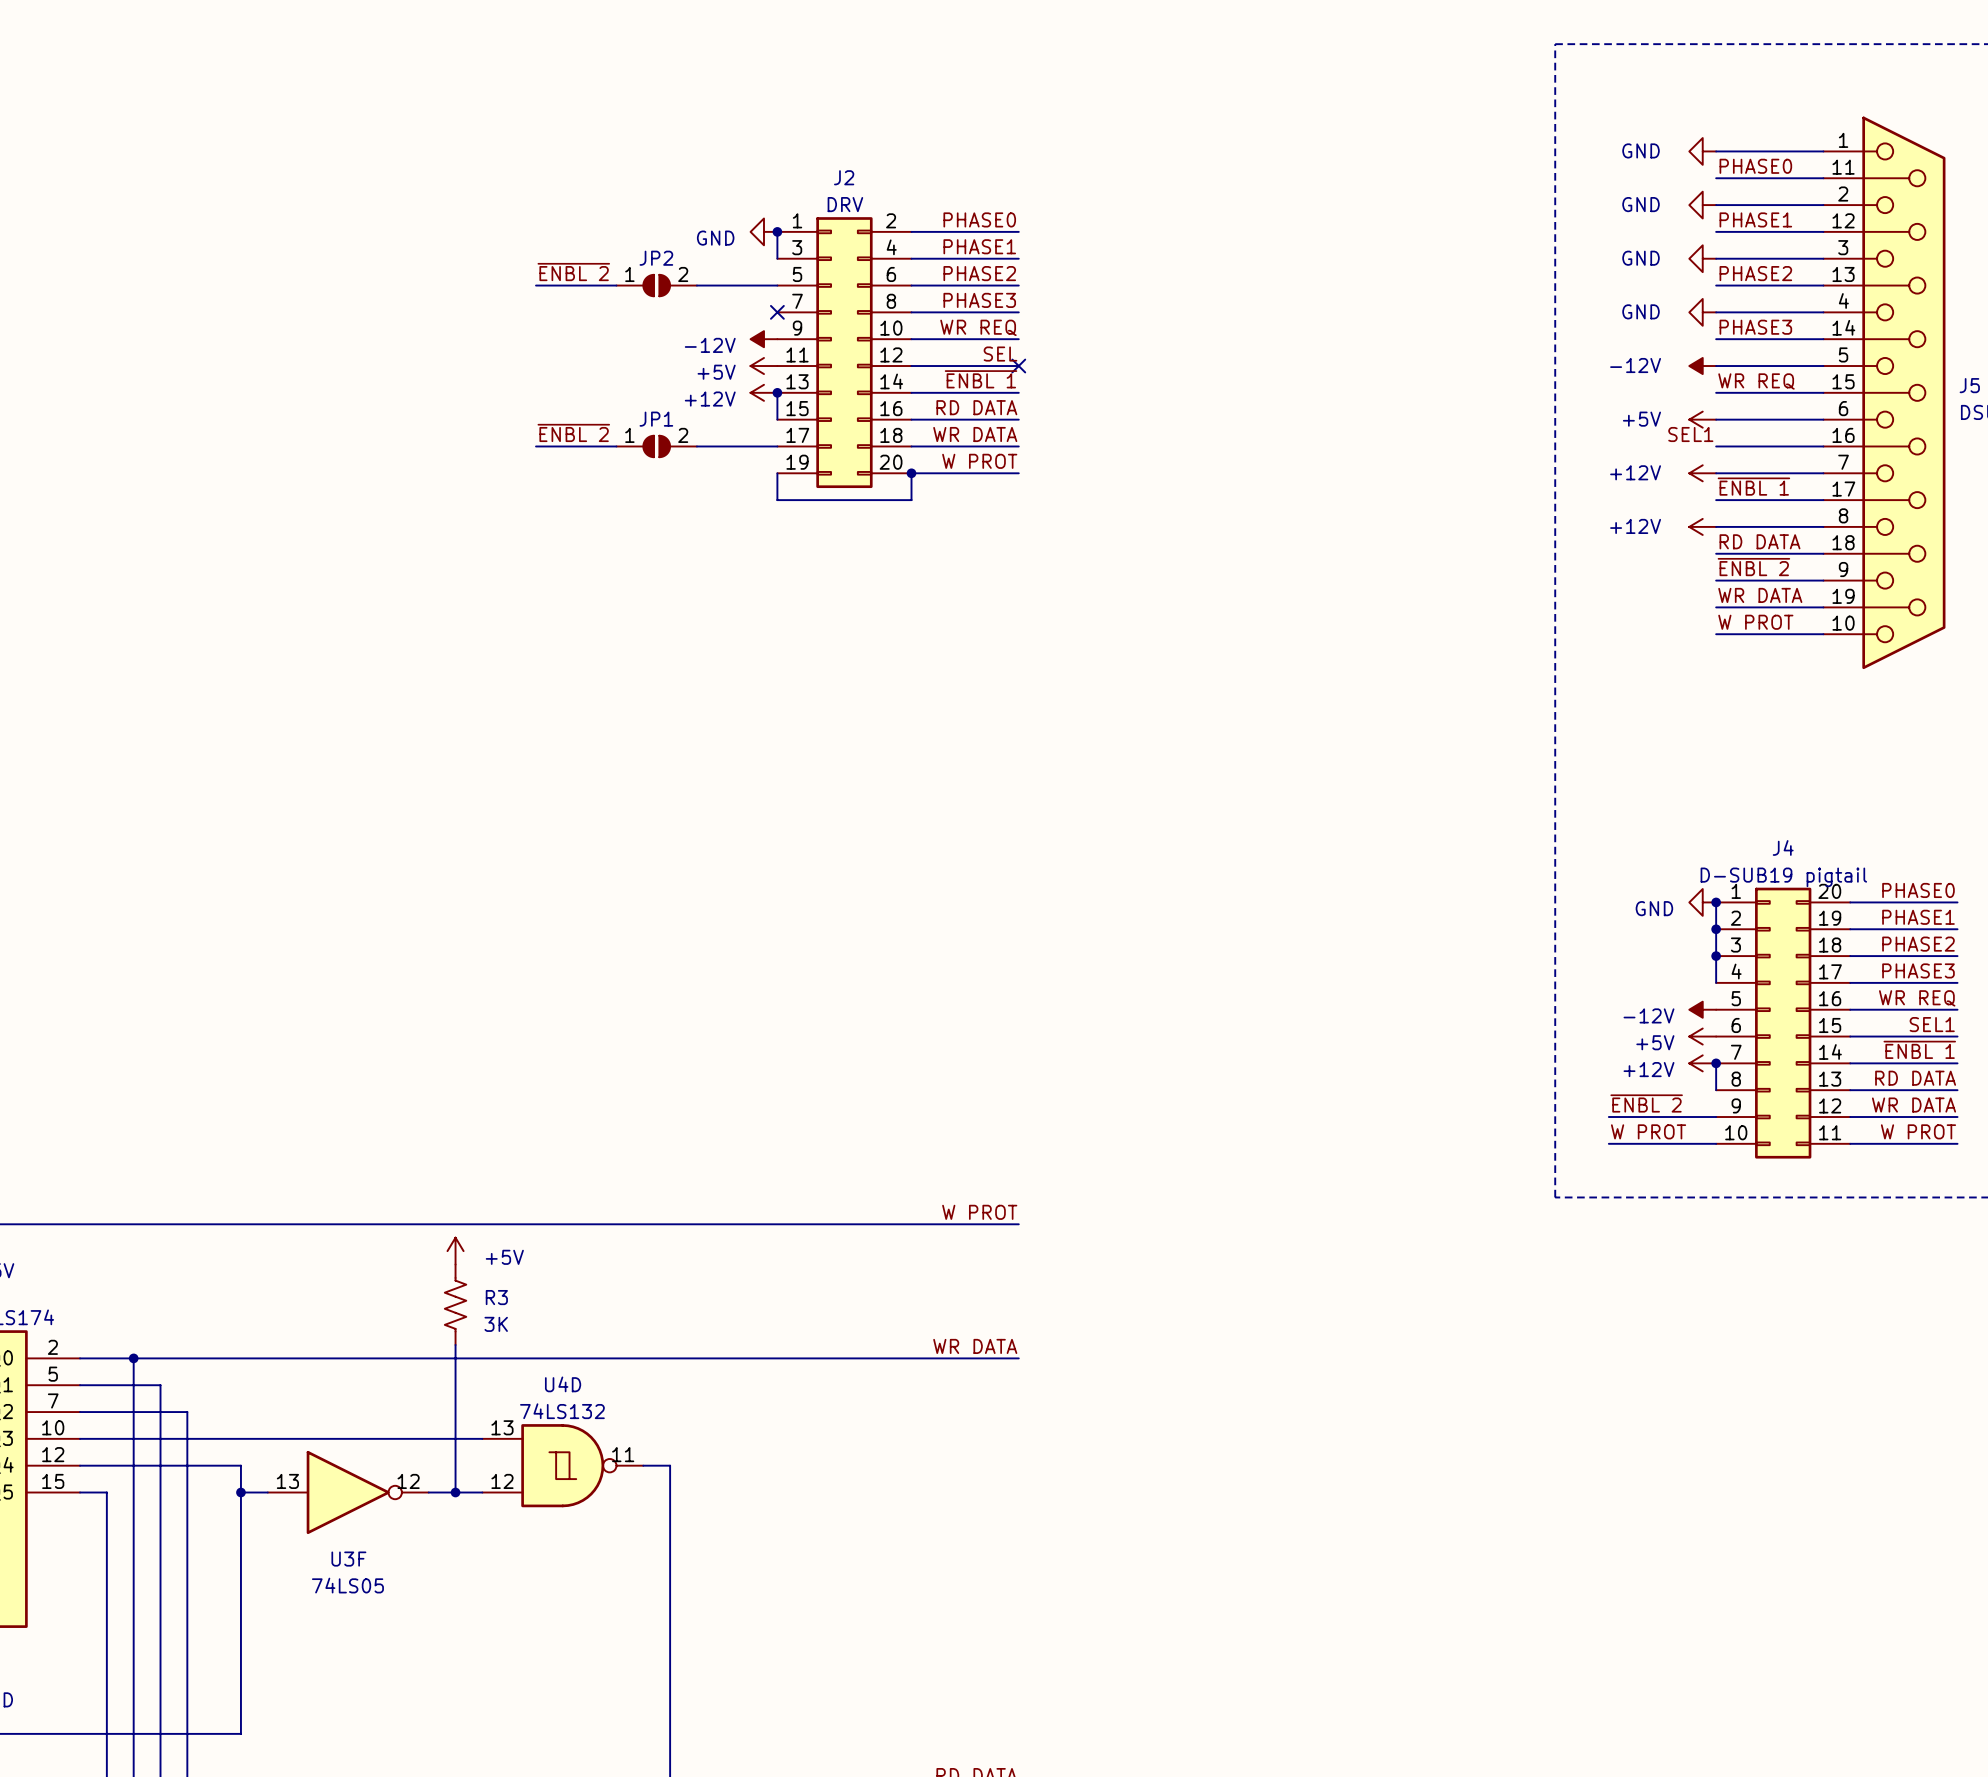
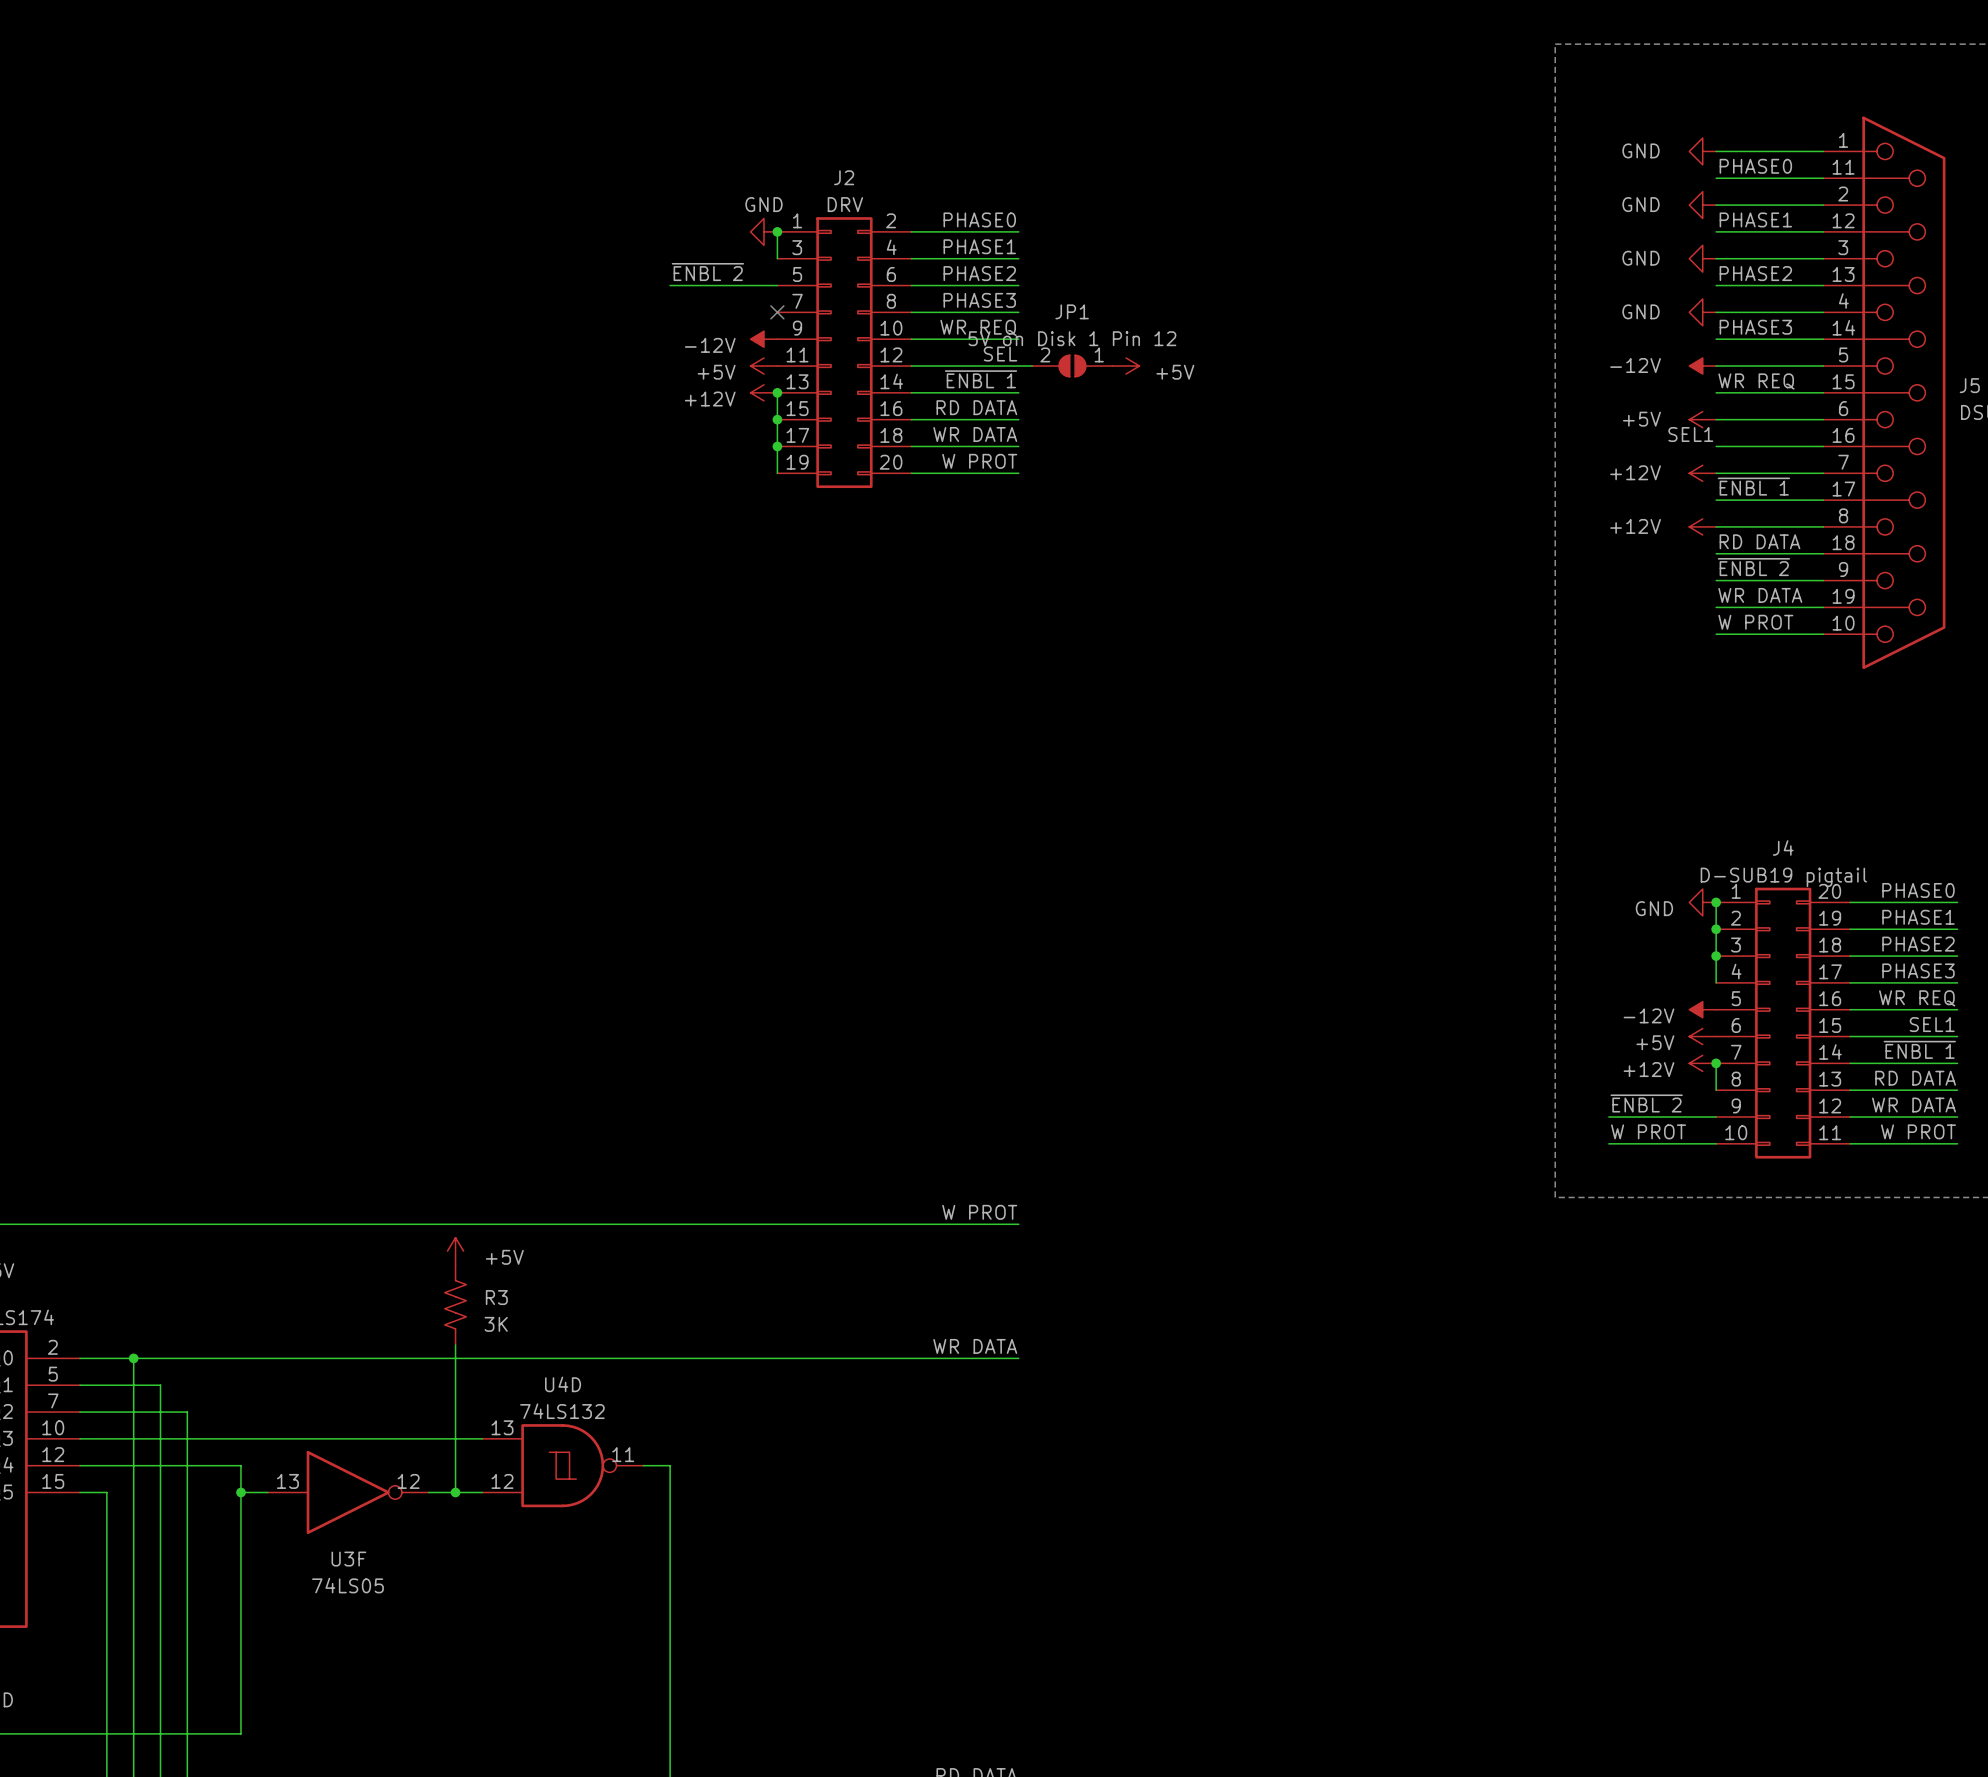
power symbol text position: GND (715, 238) -> GND (763, 204)
label: ~{ENBL 2} (573, 272) -> none
label: none -> ~{ENBL 2} (707, 272)
wire: (536, 285) (616, 285) -> none
JP2: (656, 285) -> none
JP1 value: none -> 5V on Disk 1 Pin 12 (1072, 338)
wire: none -> (1018, 366) (1032, 366)
no-connect mark: (1018, 366) -> none
power symbol: none -> +5V (1126, 366)
JP1 name position: JP1 (656, 419) -> JP1 (1072, 311)
junction: none -> (777, 419)
label: ~{ENBL 2} (573, 432) -> none
wire: (536, 446) (616, 446) -> none
JP1 rotation: 0° (656, 446) -> 180° (1072, 366)
JP1 position: (656, 446) -> (1072, 366)
wire: (696, 446) (777, 446) -> none
junction: none -> (777, 446)
wire: (777, 473) (777, 500) (911, 500) (911, 473) -> (777, 473) (777, 419)
junction: (911, 473) -> none

